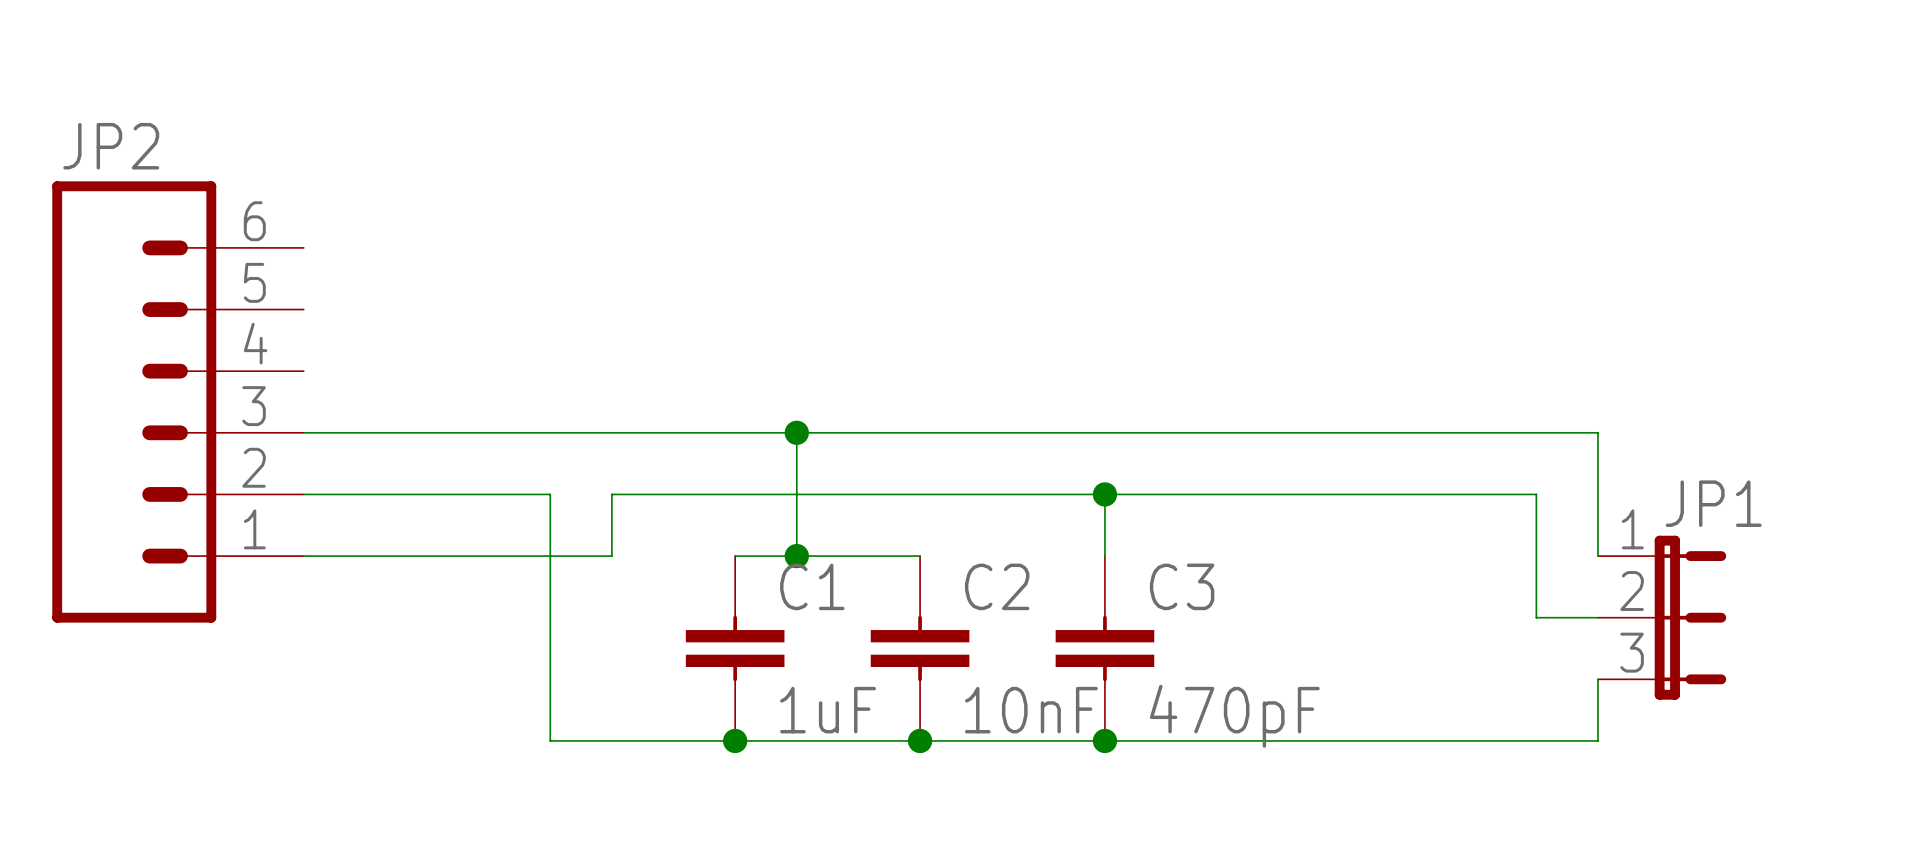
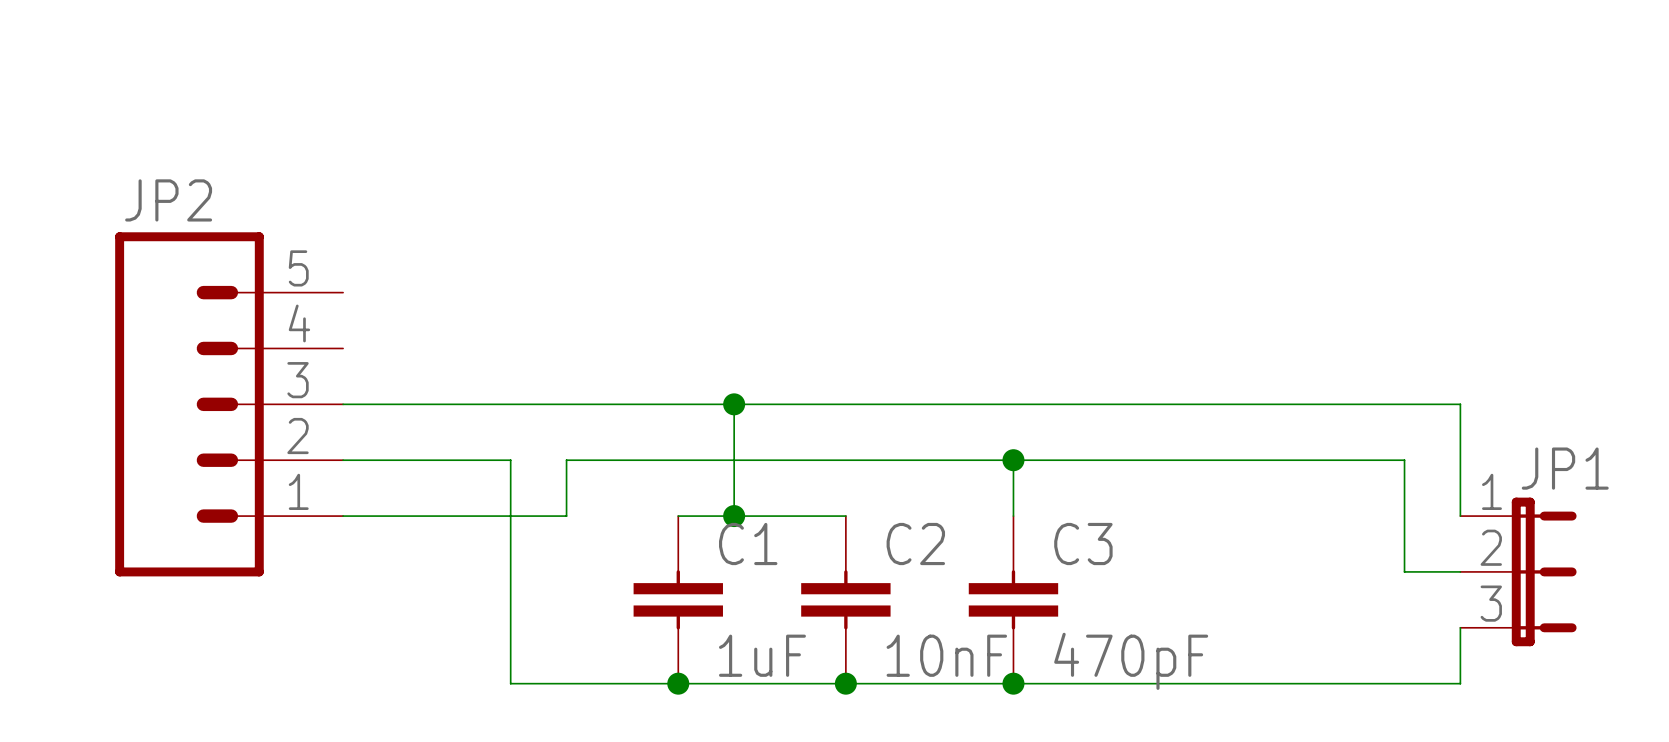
JP2 symbol: [52, 181, 304, 623] -> [115, 232, 344, 577]

